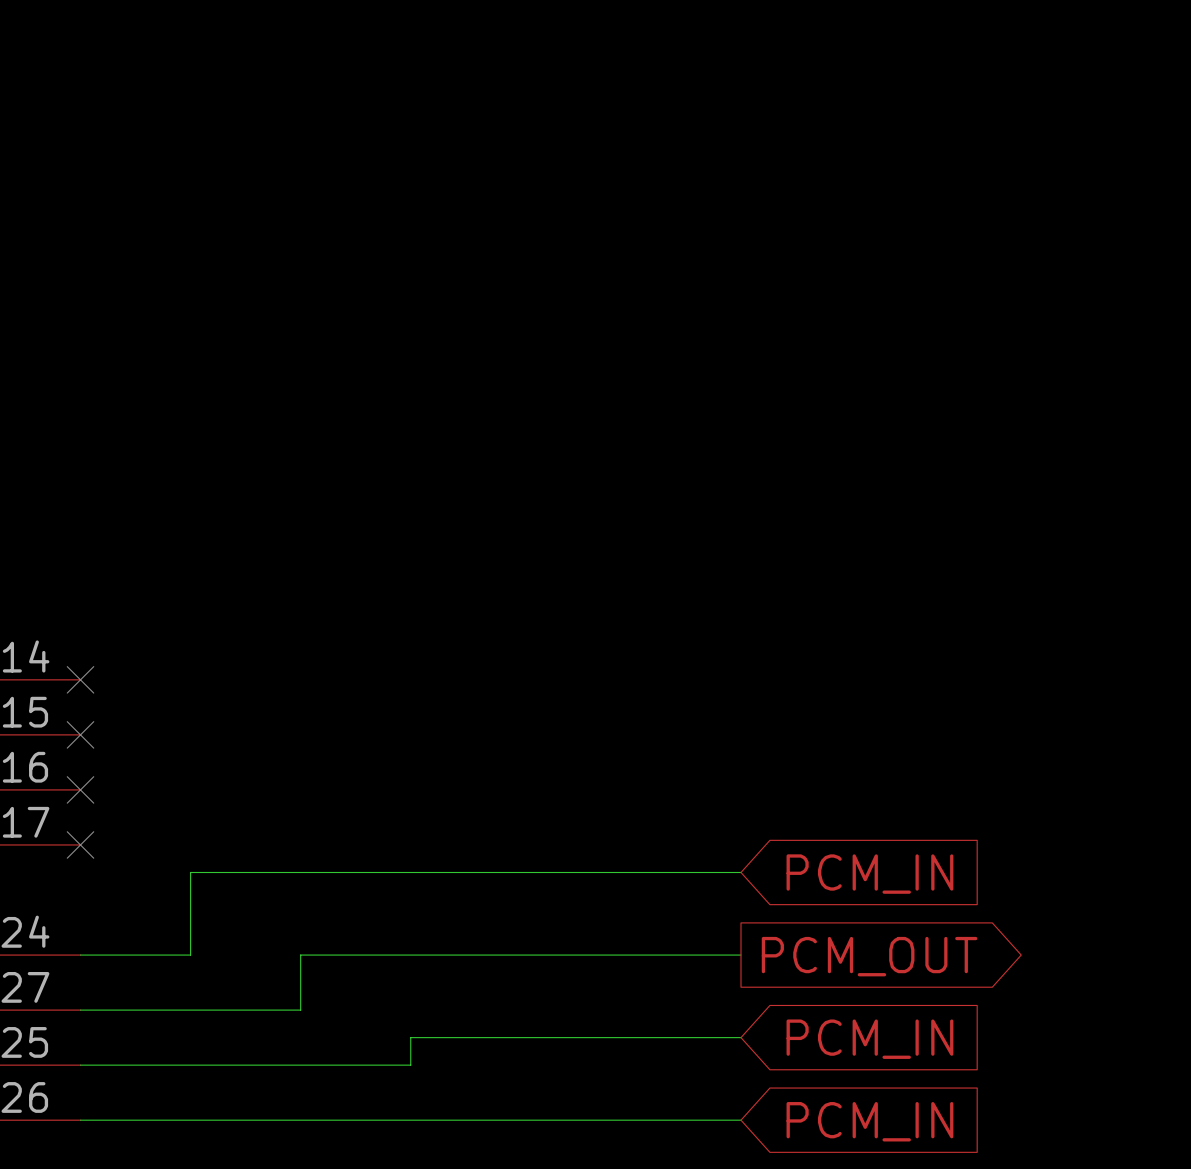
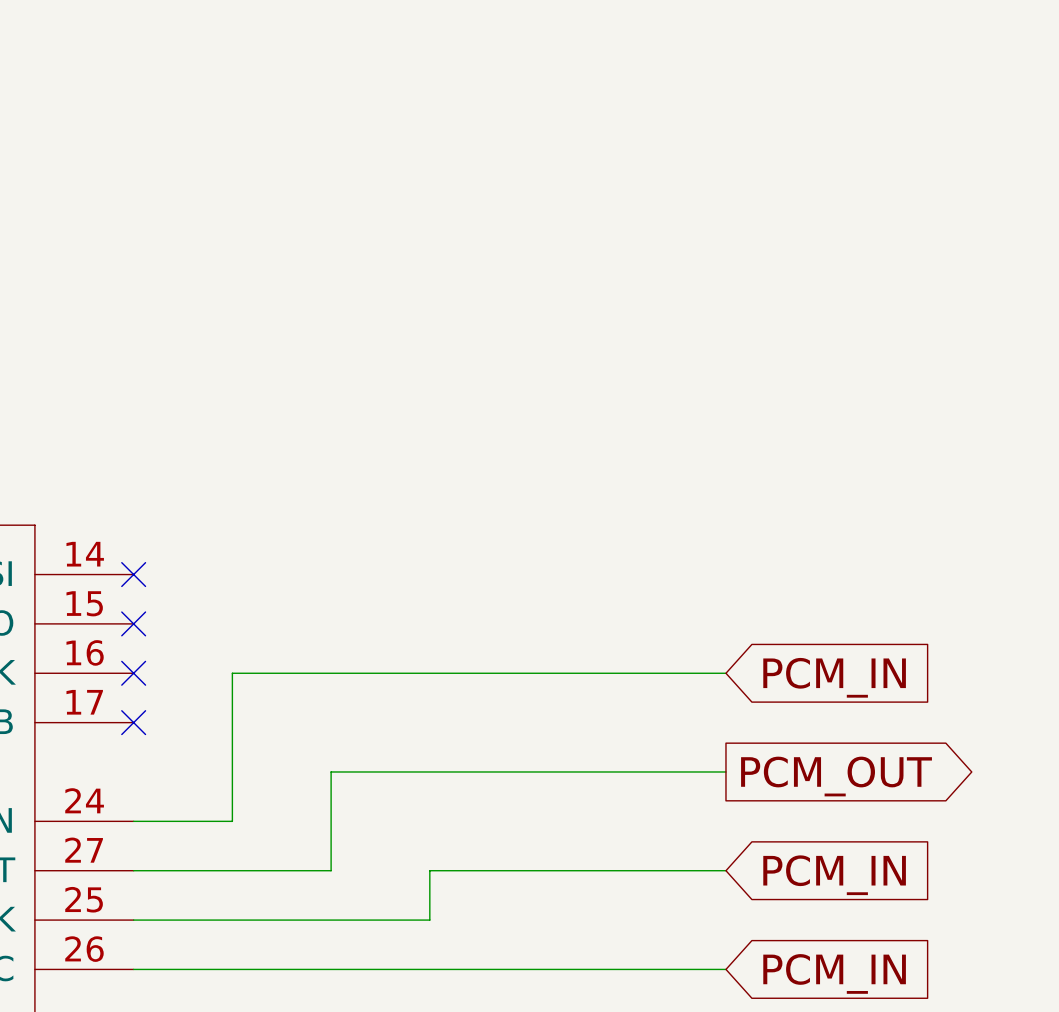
global label: none -> PCM_IN (834, 677)
wire: (190, 872) (740, 872) -> (232, 747) (232, 673) (725, 673)
global label: PCM_IN (869, 874) -> none
wire: (300, 955) (740, 955) -> (331, 821) (331, 771) (725, 771)
global label position: PCM_OUT (869, 956) -> PCM_OUT (836, 776)
wire: (410, 1037) (740, 1037) -> (429, 895) (429, 870) (725, 870)
global label position: PCM_IN (869, 1039) -> PCM_IN (834, 875)

